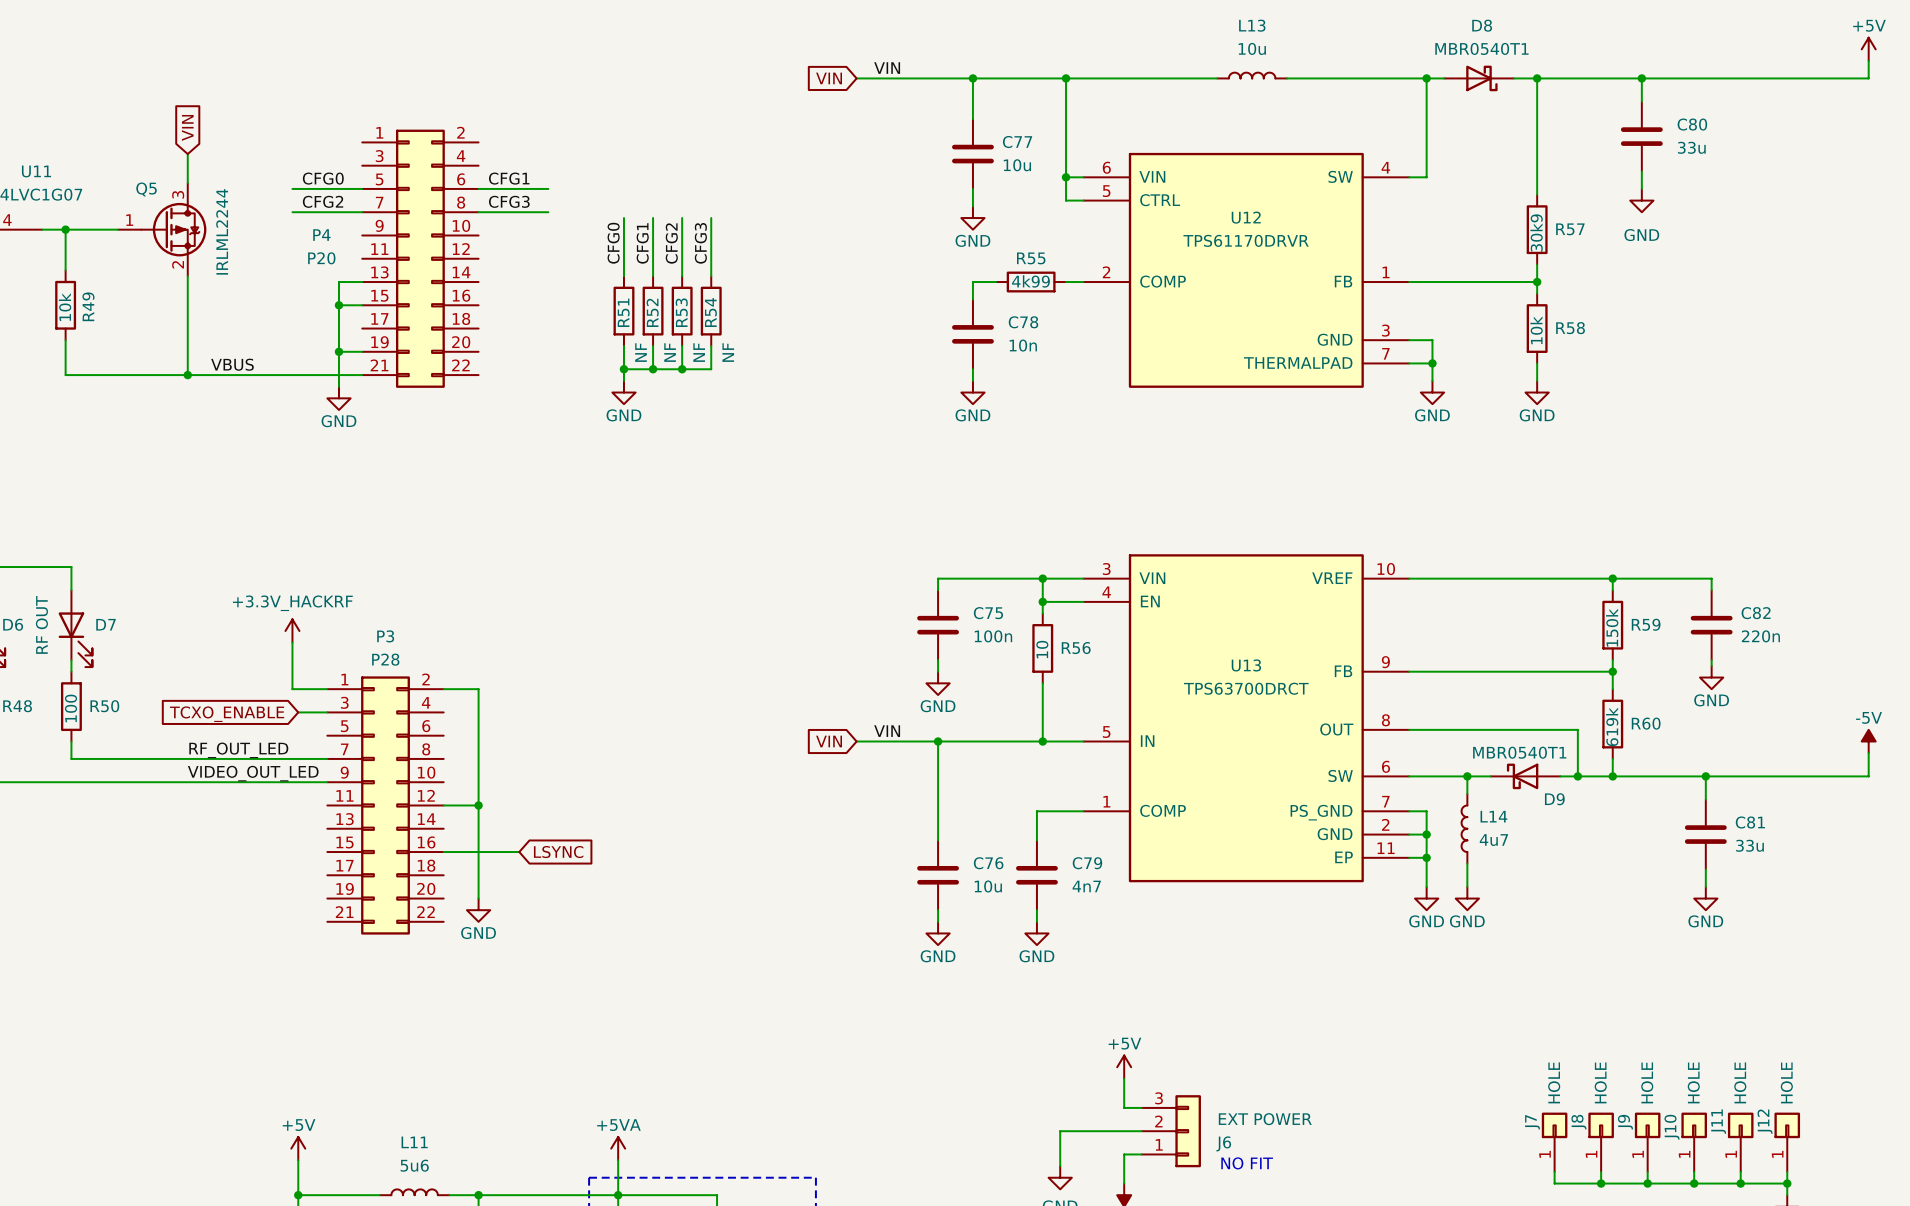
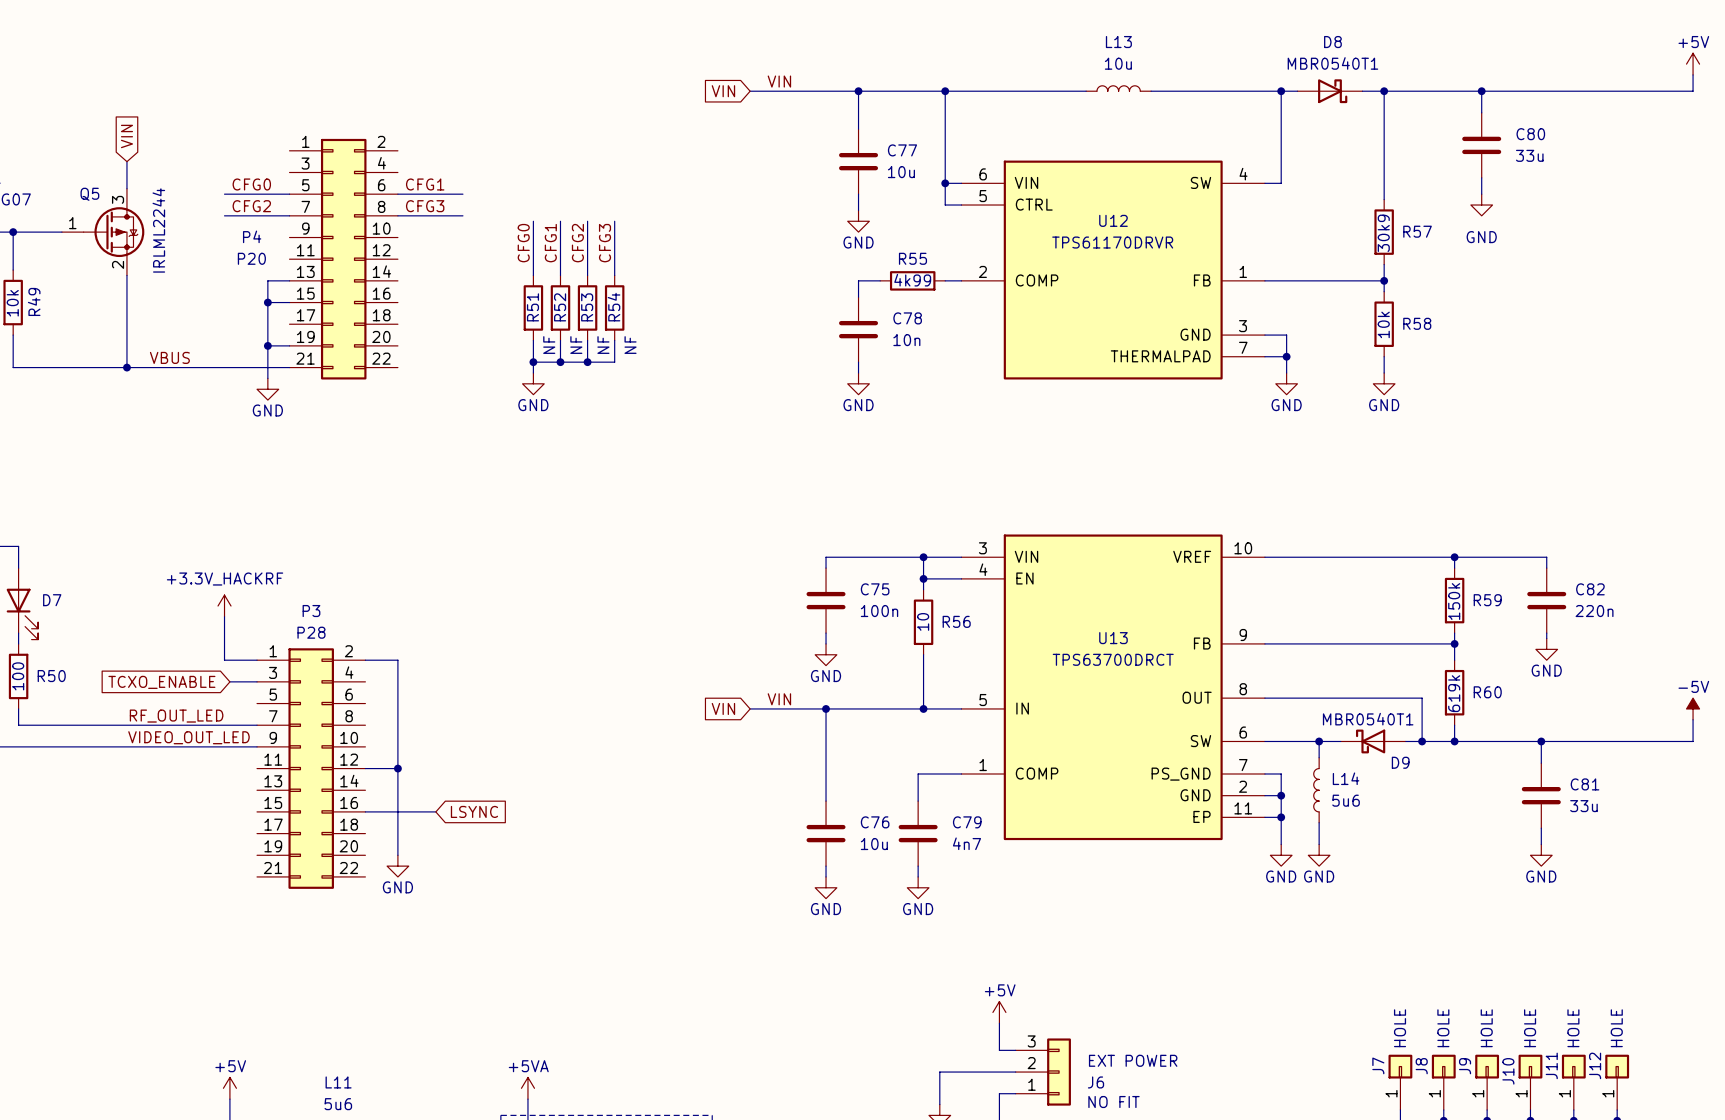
L14 value: 4u7 (1493, 840) -> 5u6 (1346, 800)

